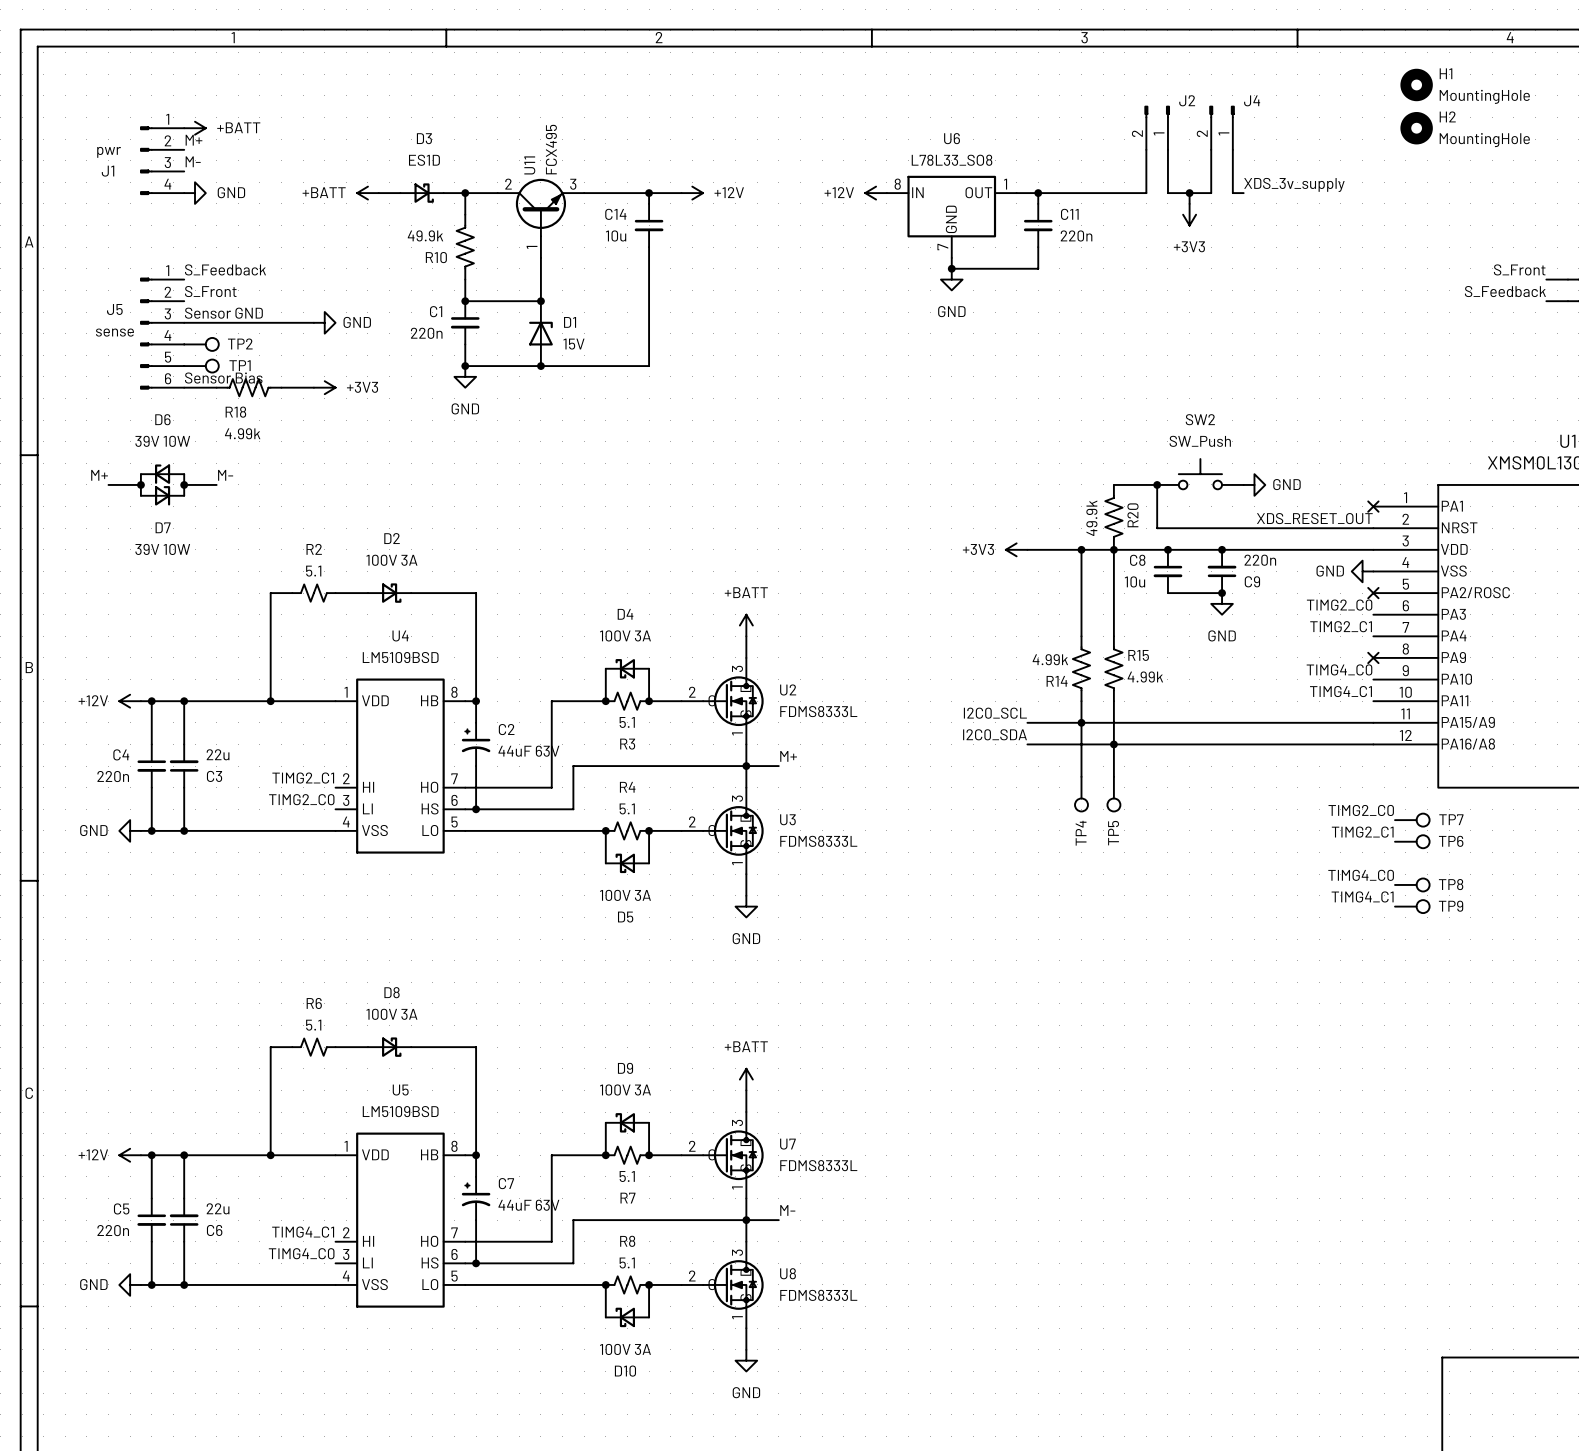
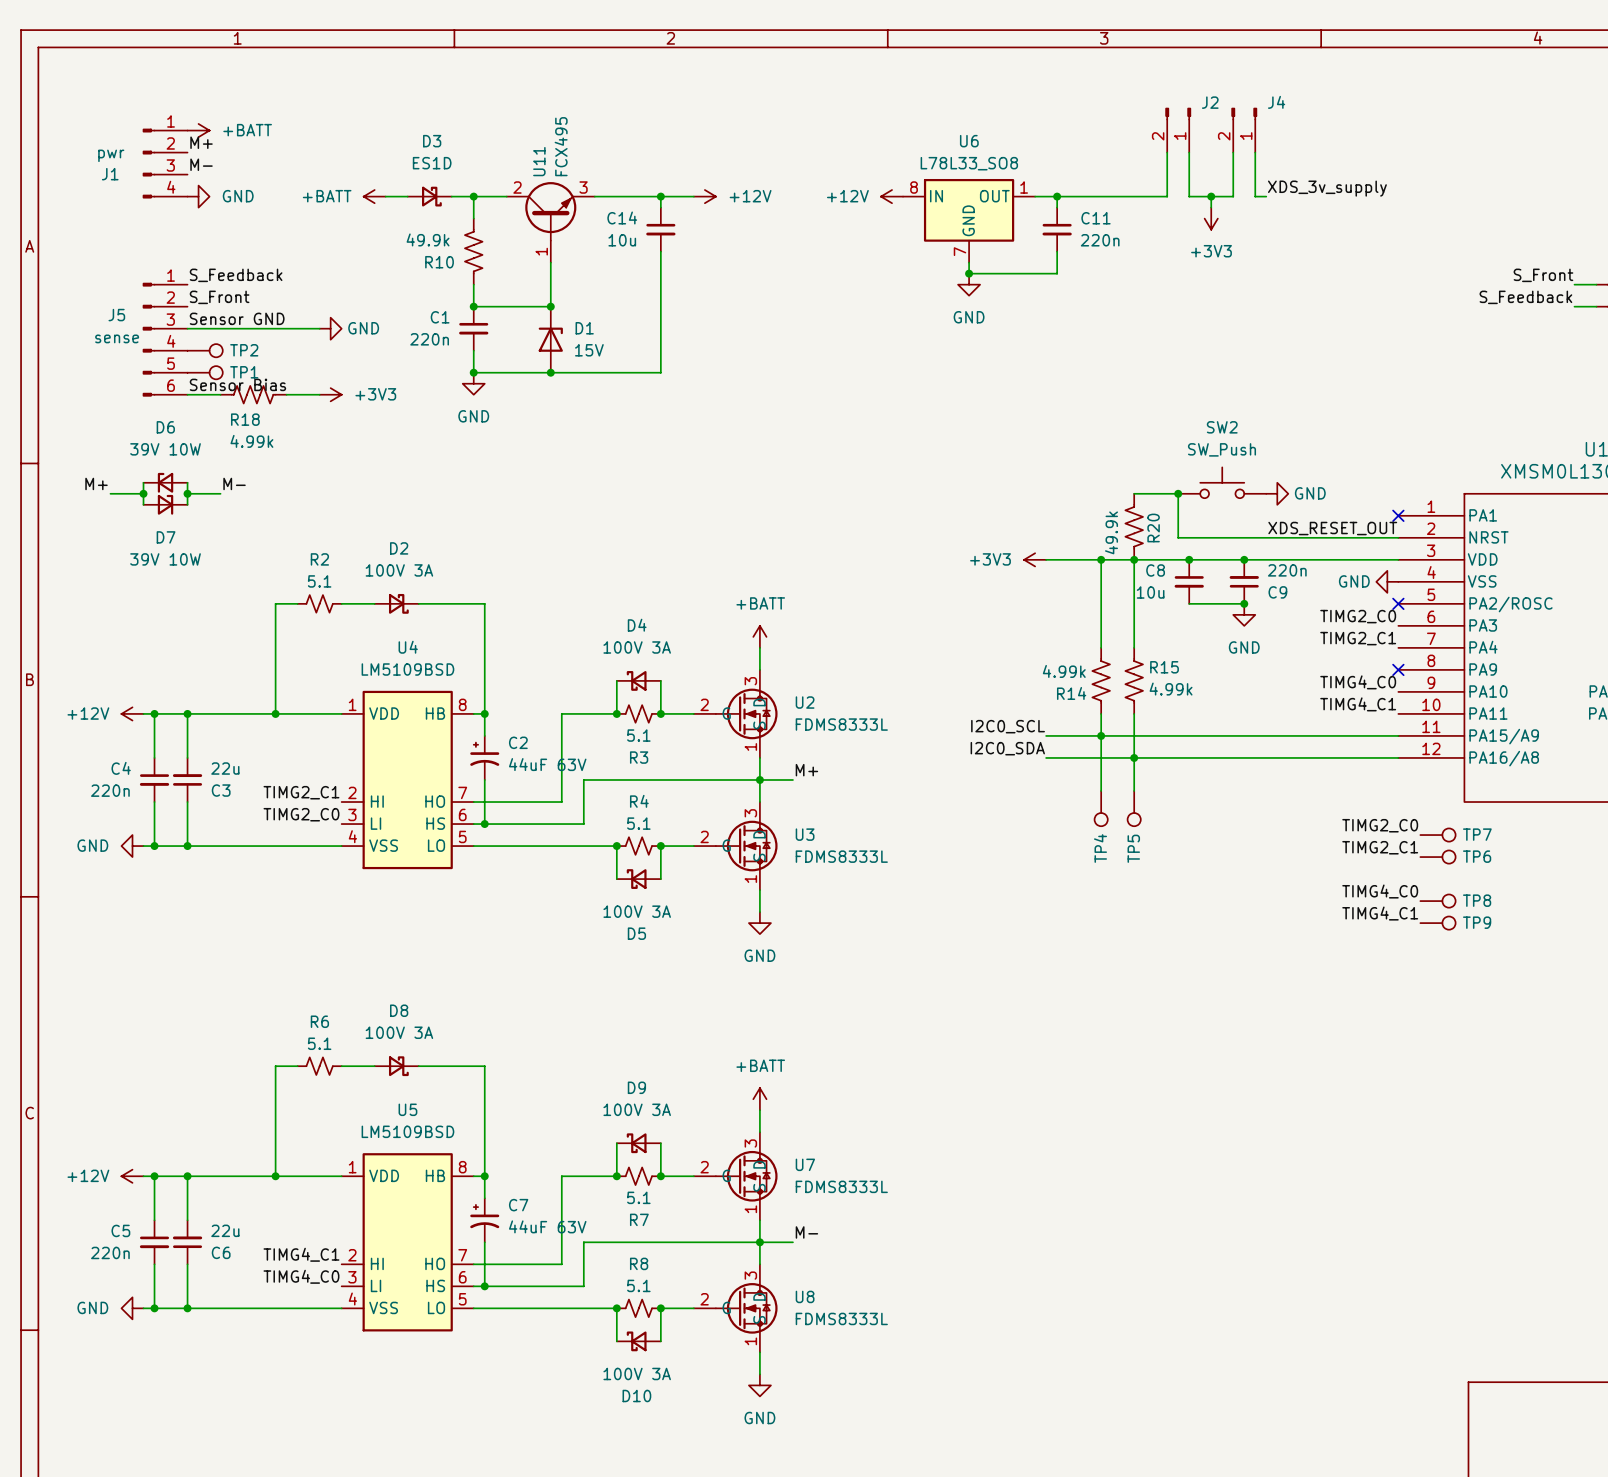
H1: MountingHole (1416, 84) -> none
H2: MountingHole (1416, 128) -> none

